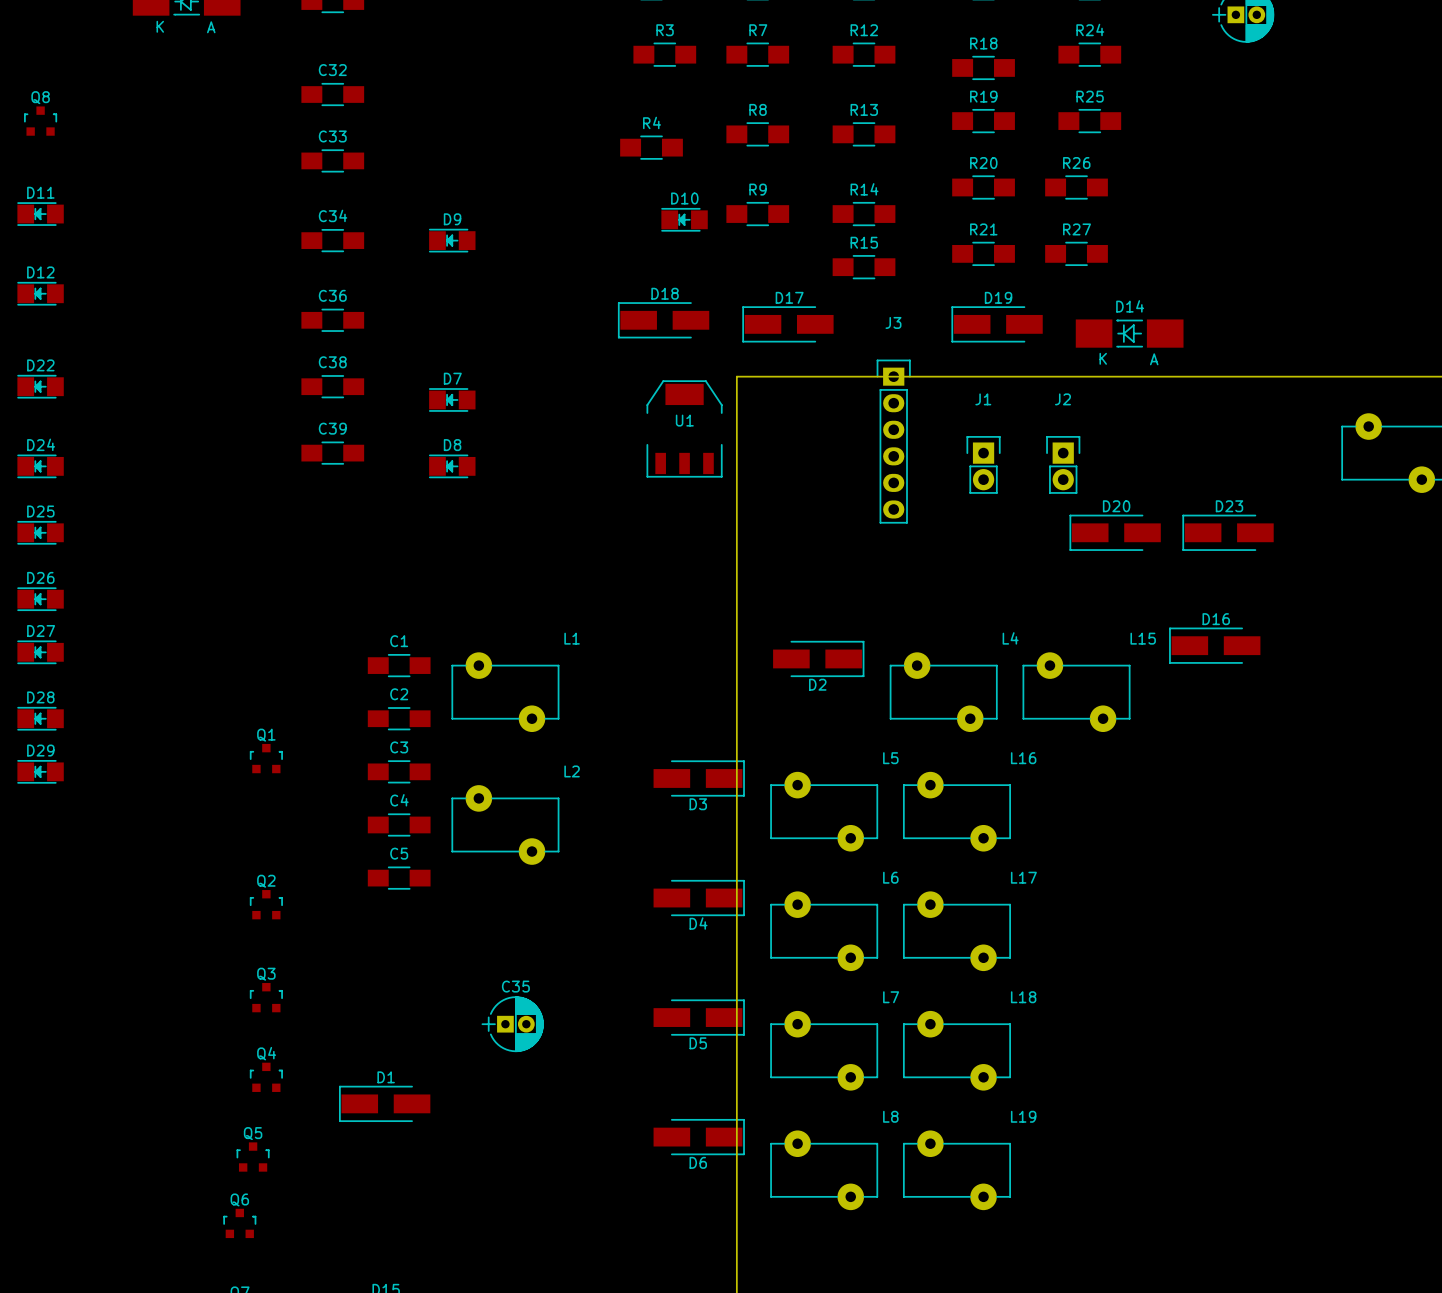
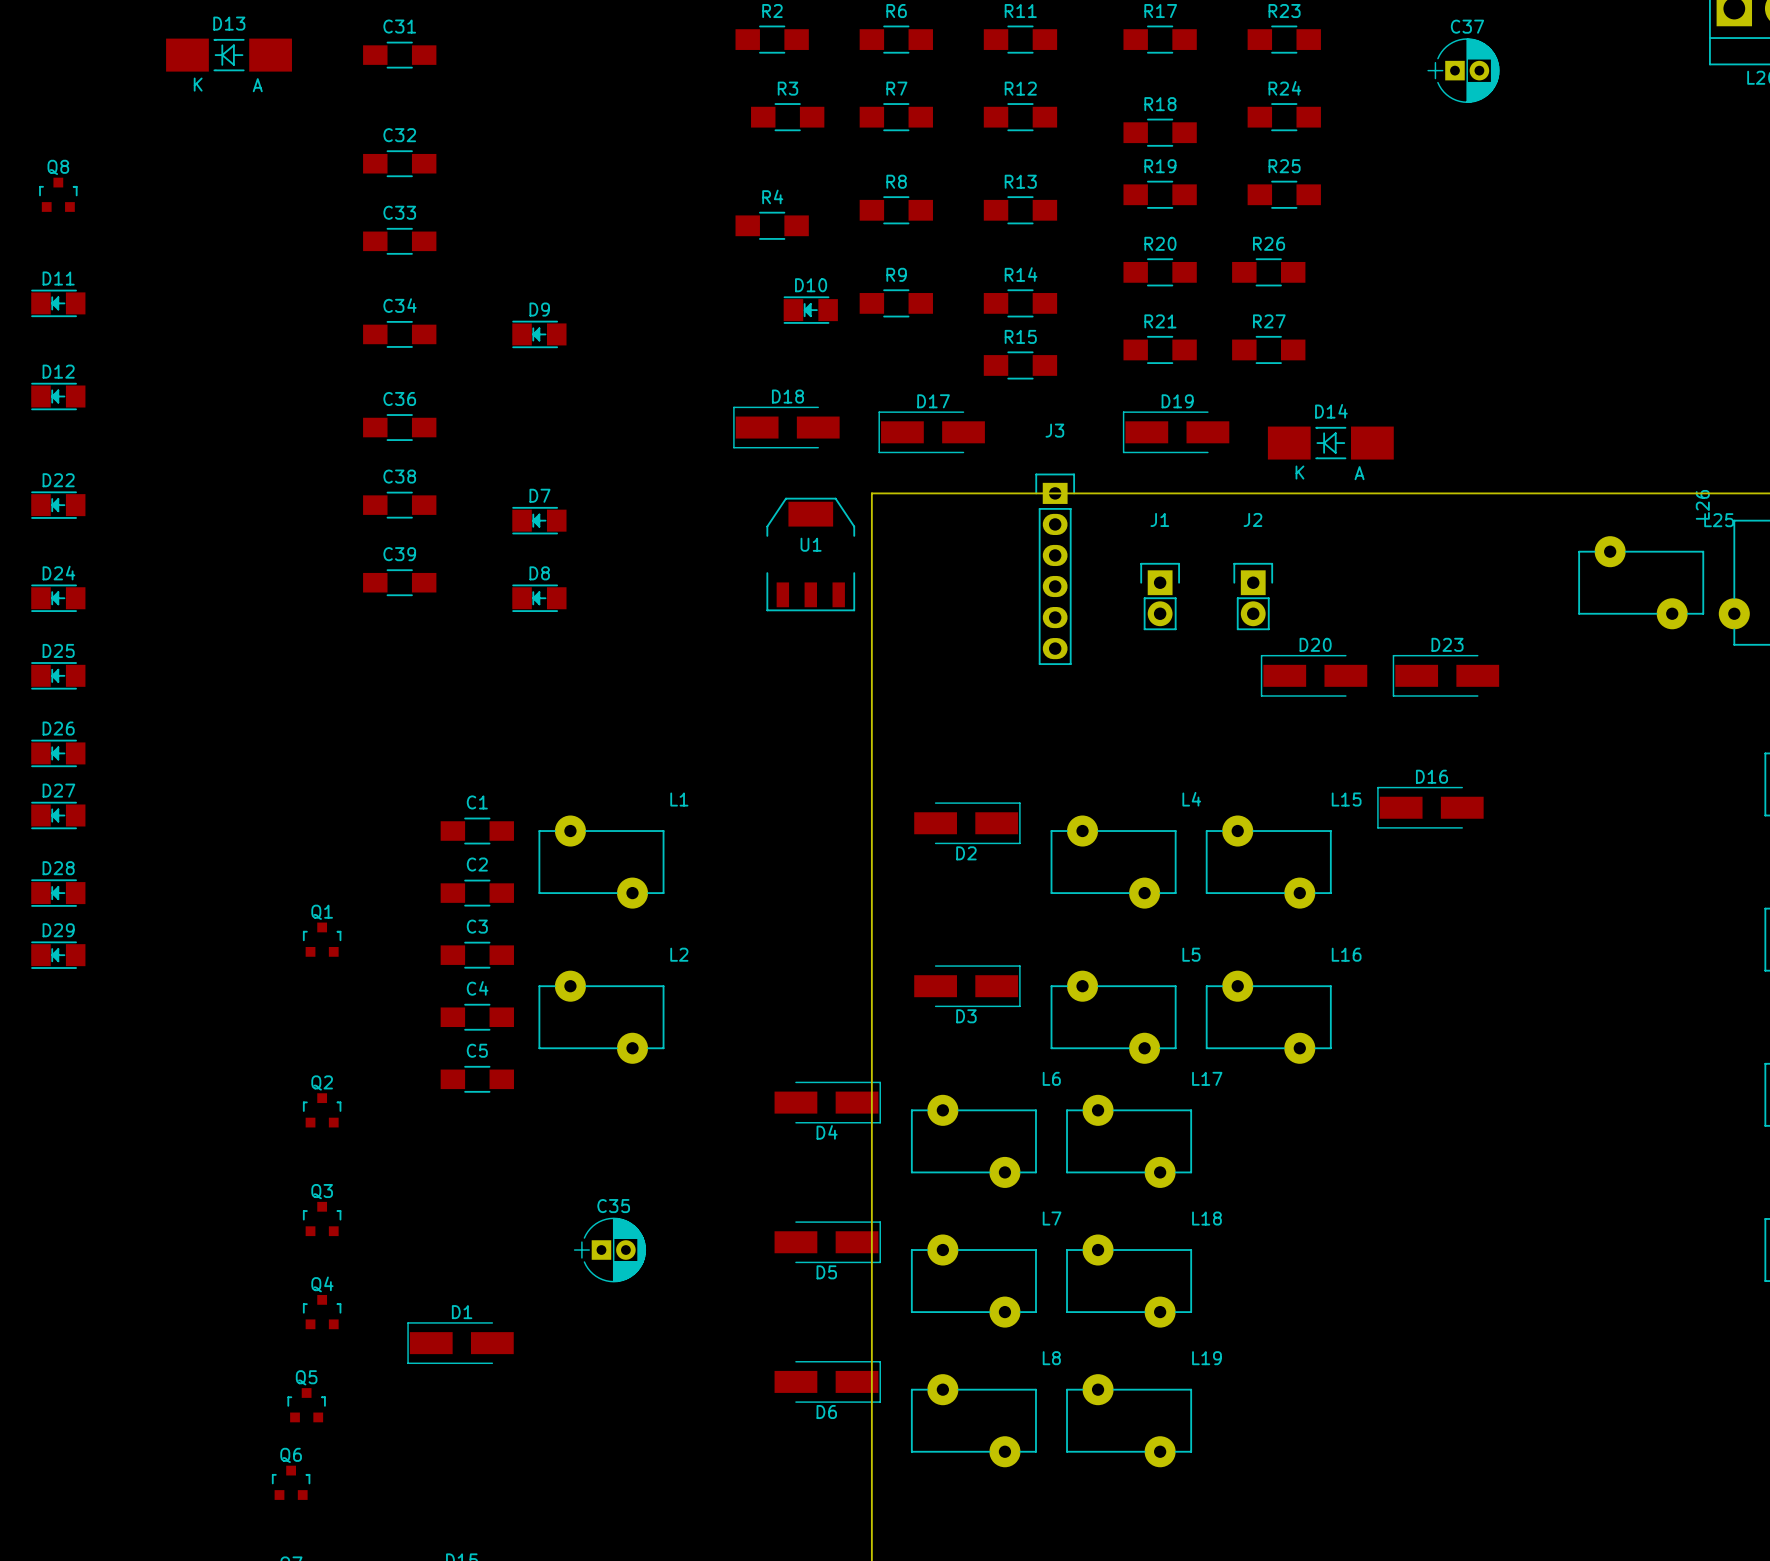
D3 position: (699, 778) -> (967, 986)
L5 position: (824, 811) -> (1113, 1017)
L16 position: (956, 811) -> (1268, 1017)

